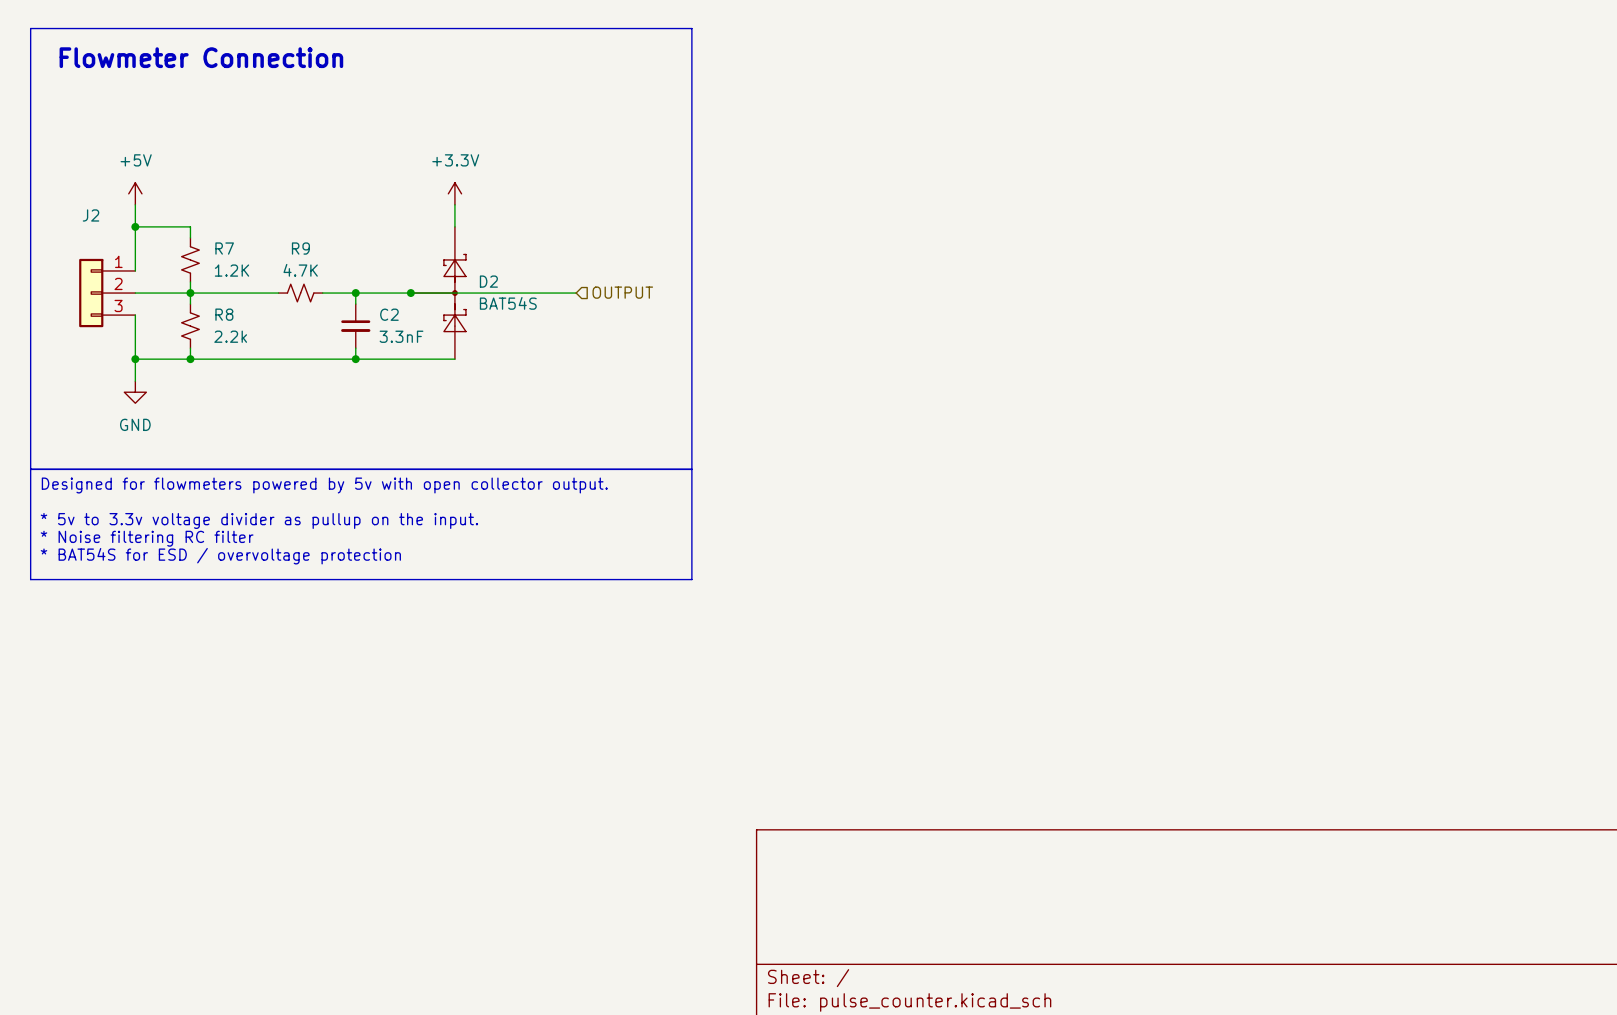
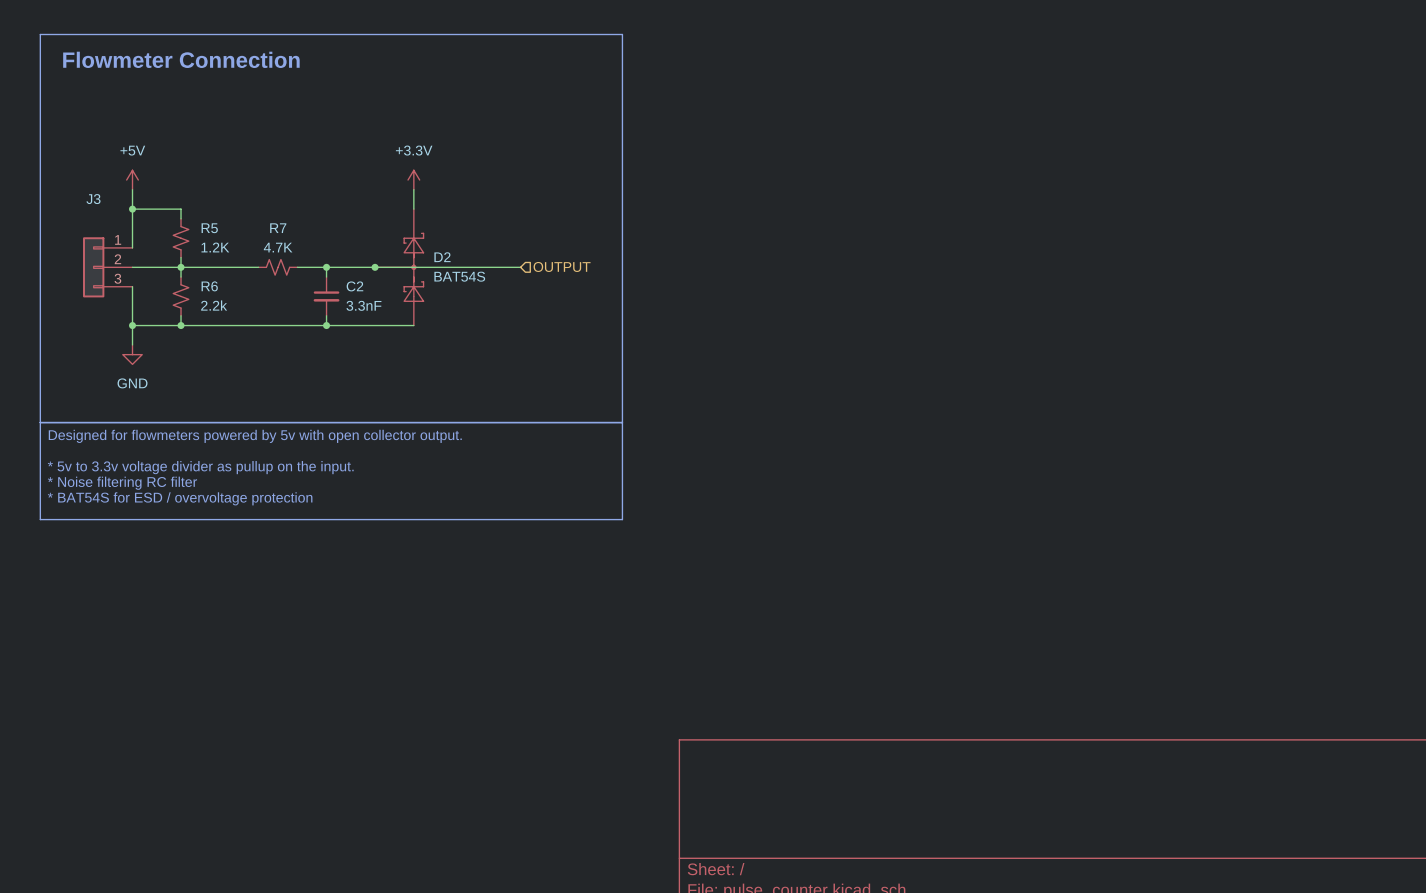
J2 name: J2 (91, 215) -> J3 (93, 199)
R7 name: R7 (224, 248) -> R5 (209, 228)
R9 name: R9 (300, 248) -> R7 (278, 228)
R8 name: R8 (224, 314) -> R6 (209, 286)

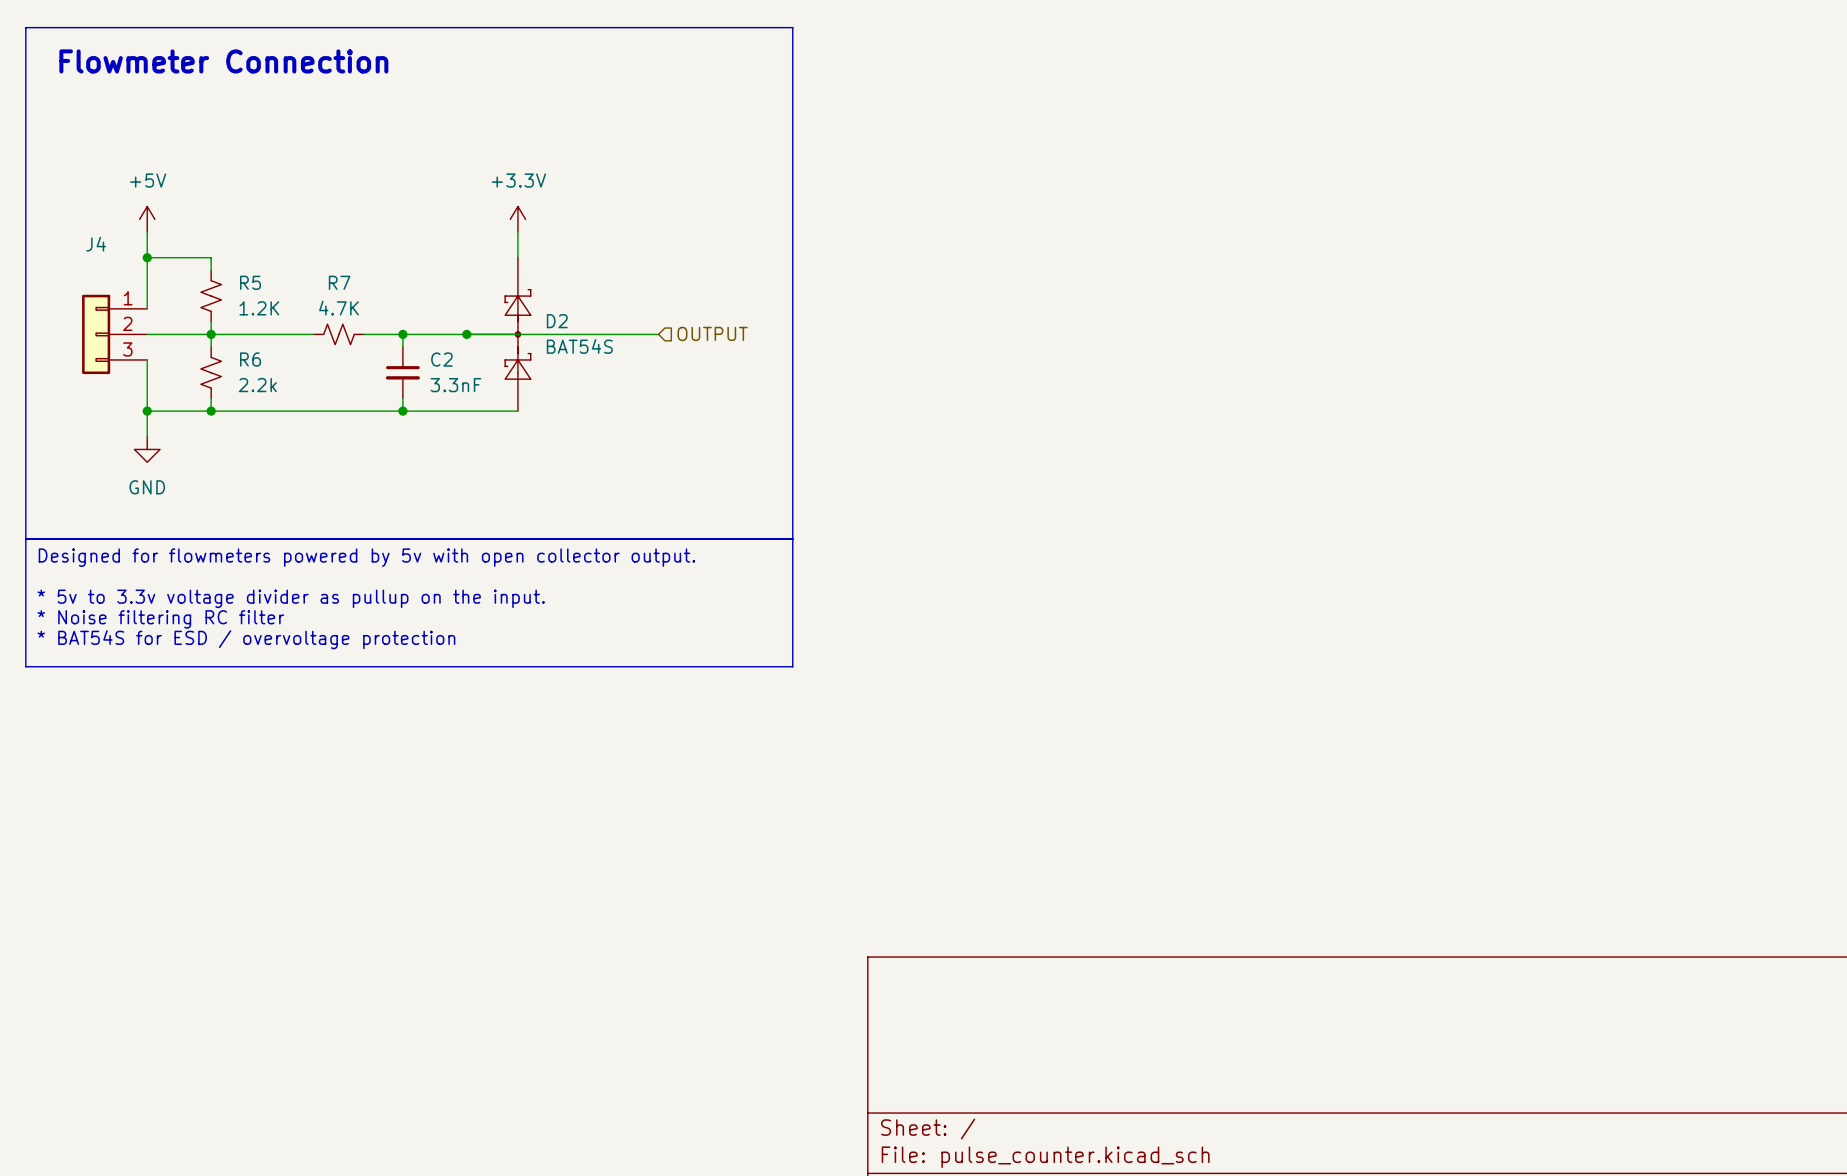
J3 name: J3 (93, 199) -> J4 (96, 244)

